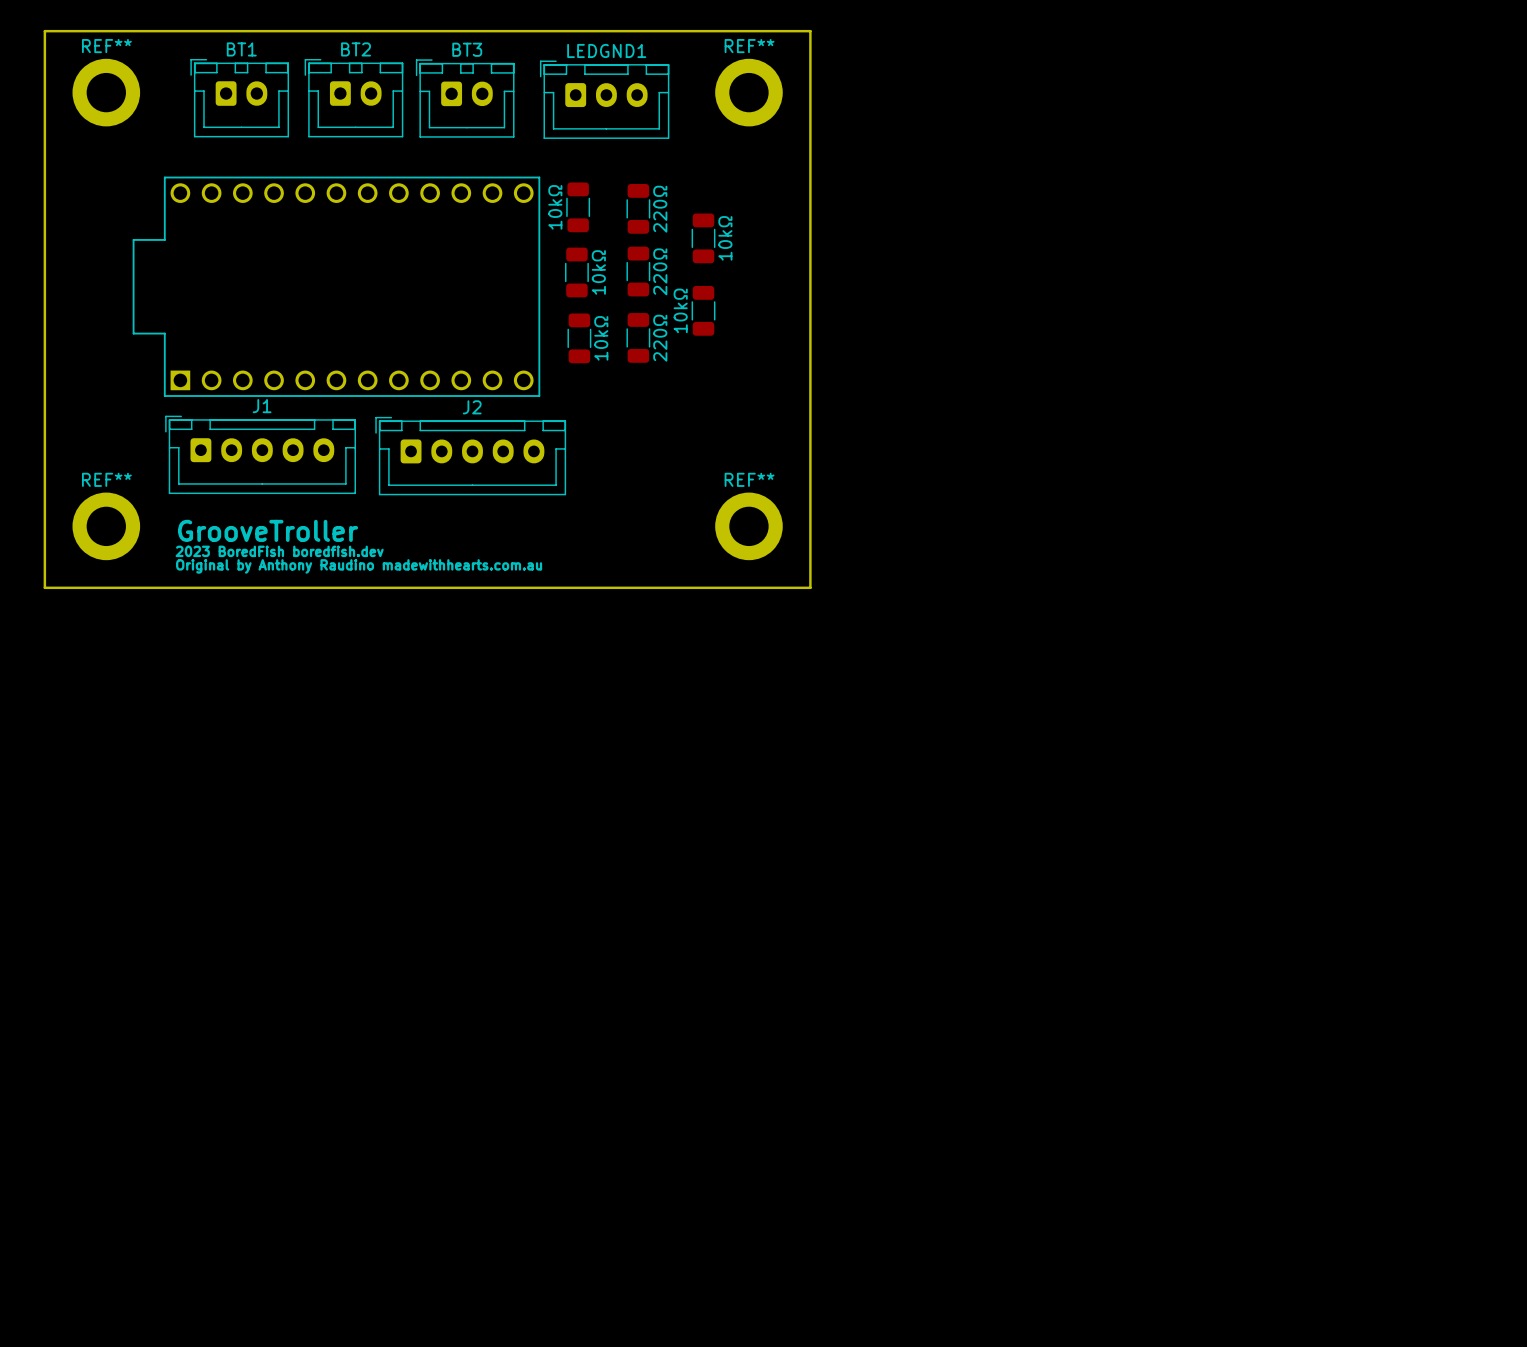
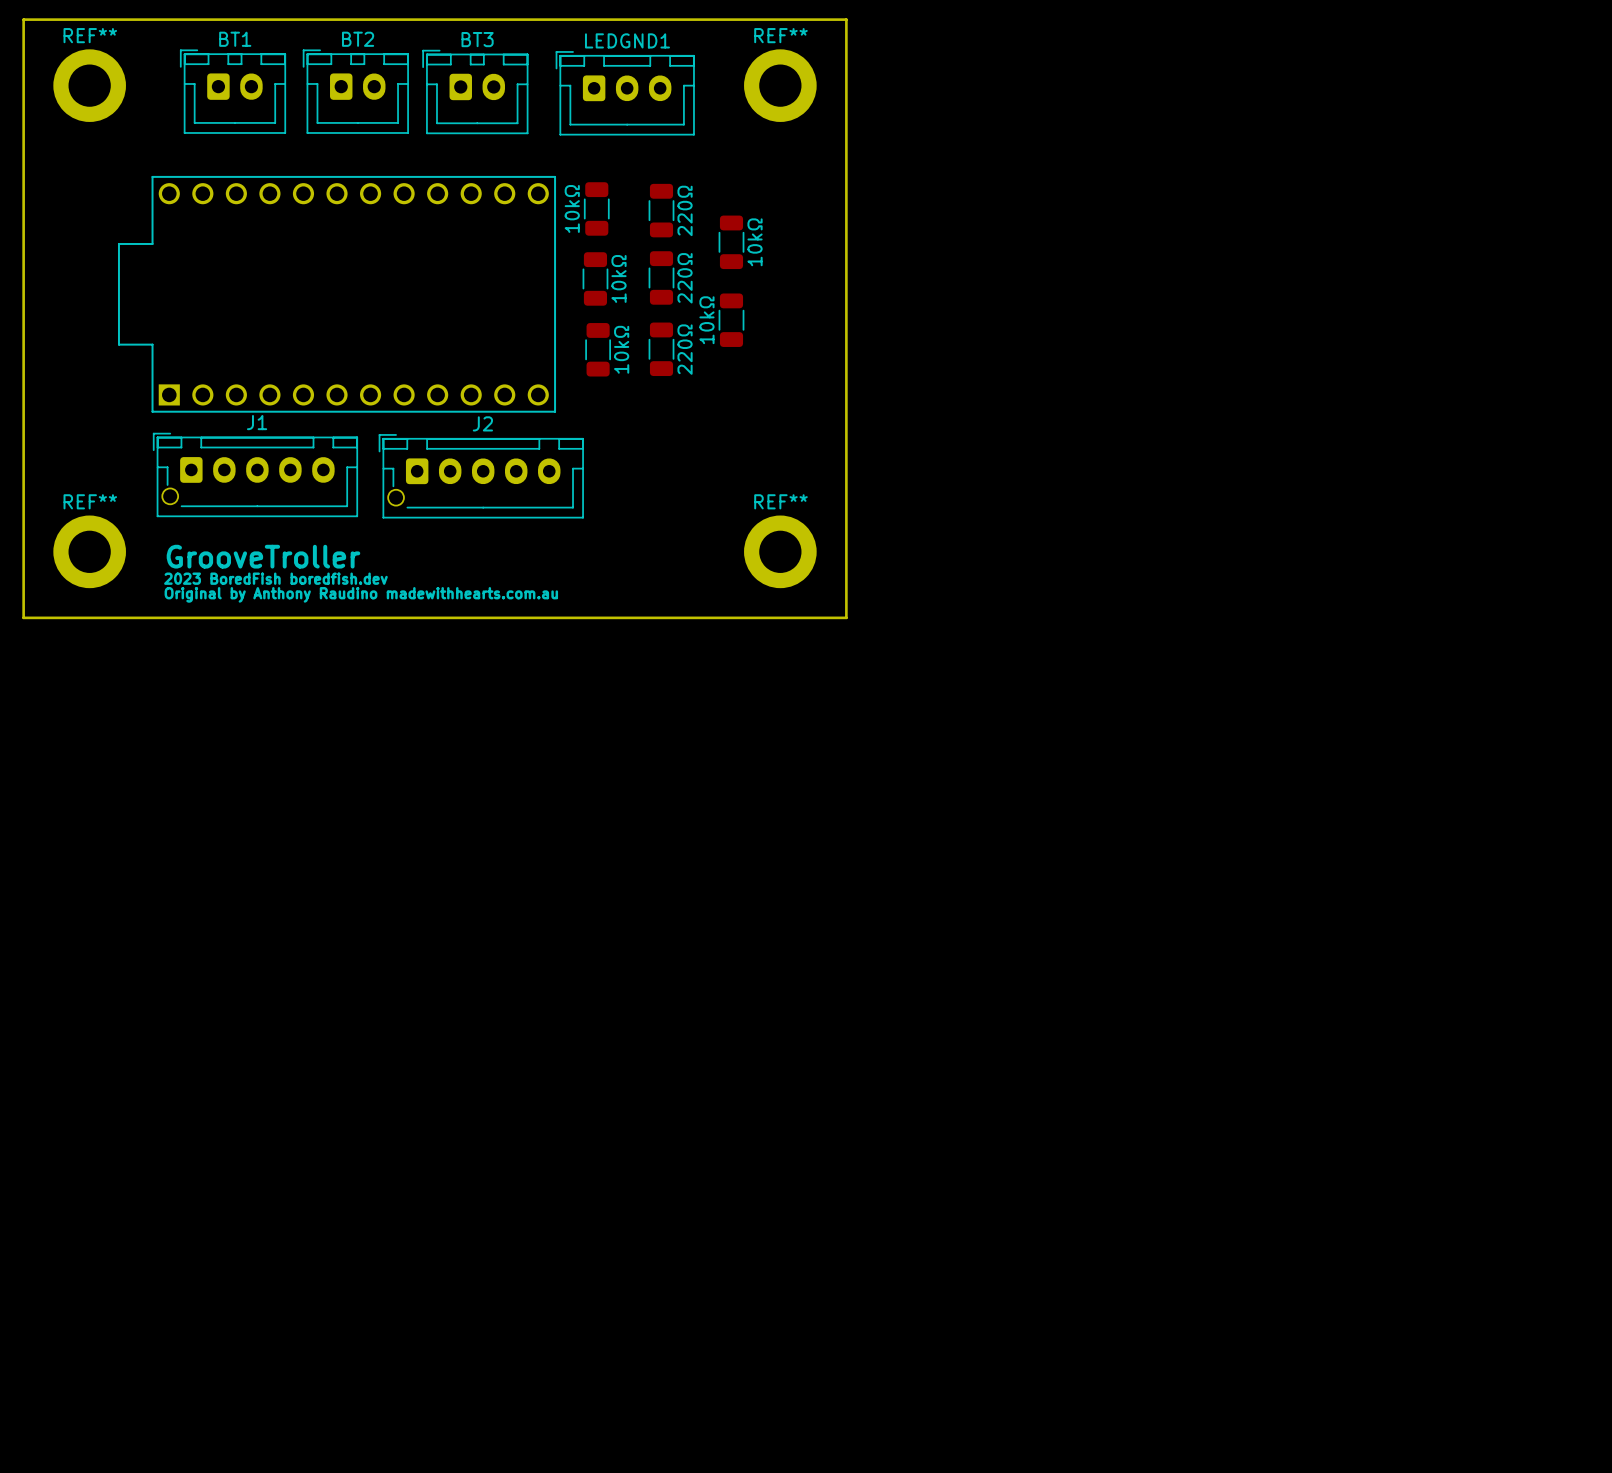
J1 footprint: [165, 415, 357, 495] -> [152, 432, 359, 518]
J2 footprint: [375, 416, 567, 496] -> [378, 434, 584, 519]

